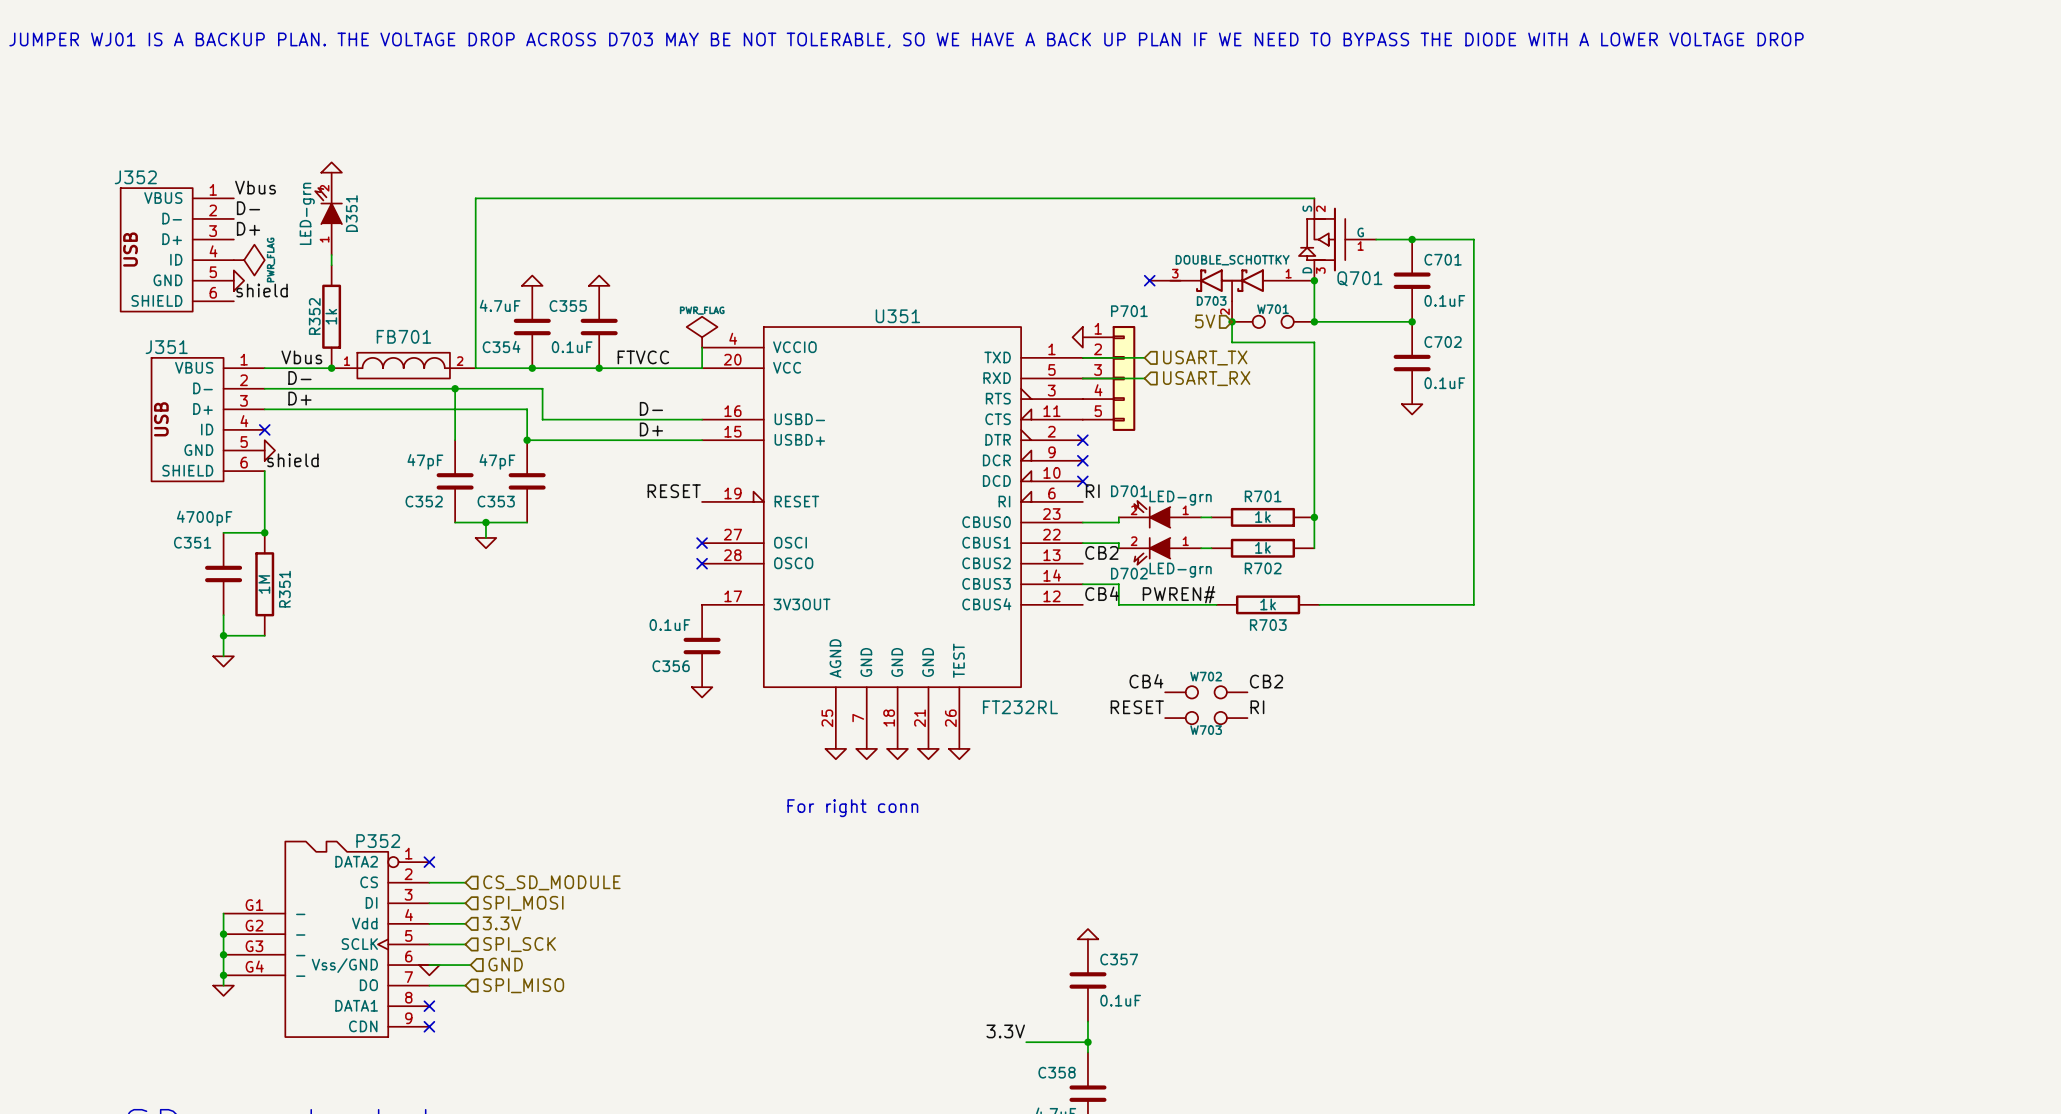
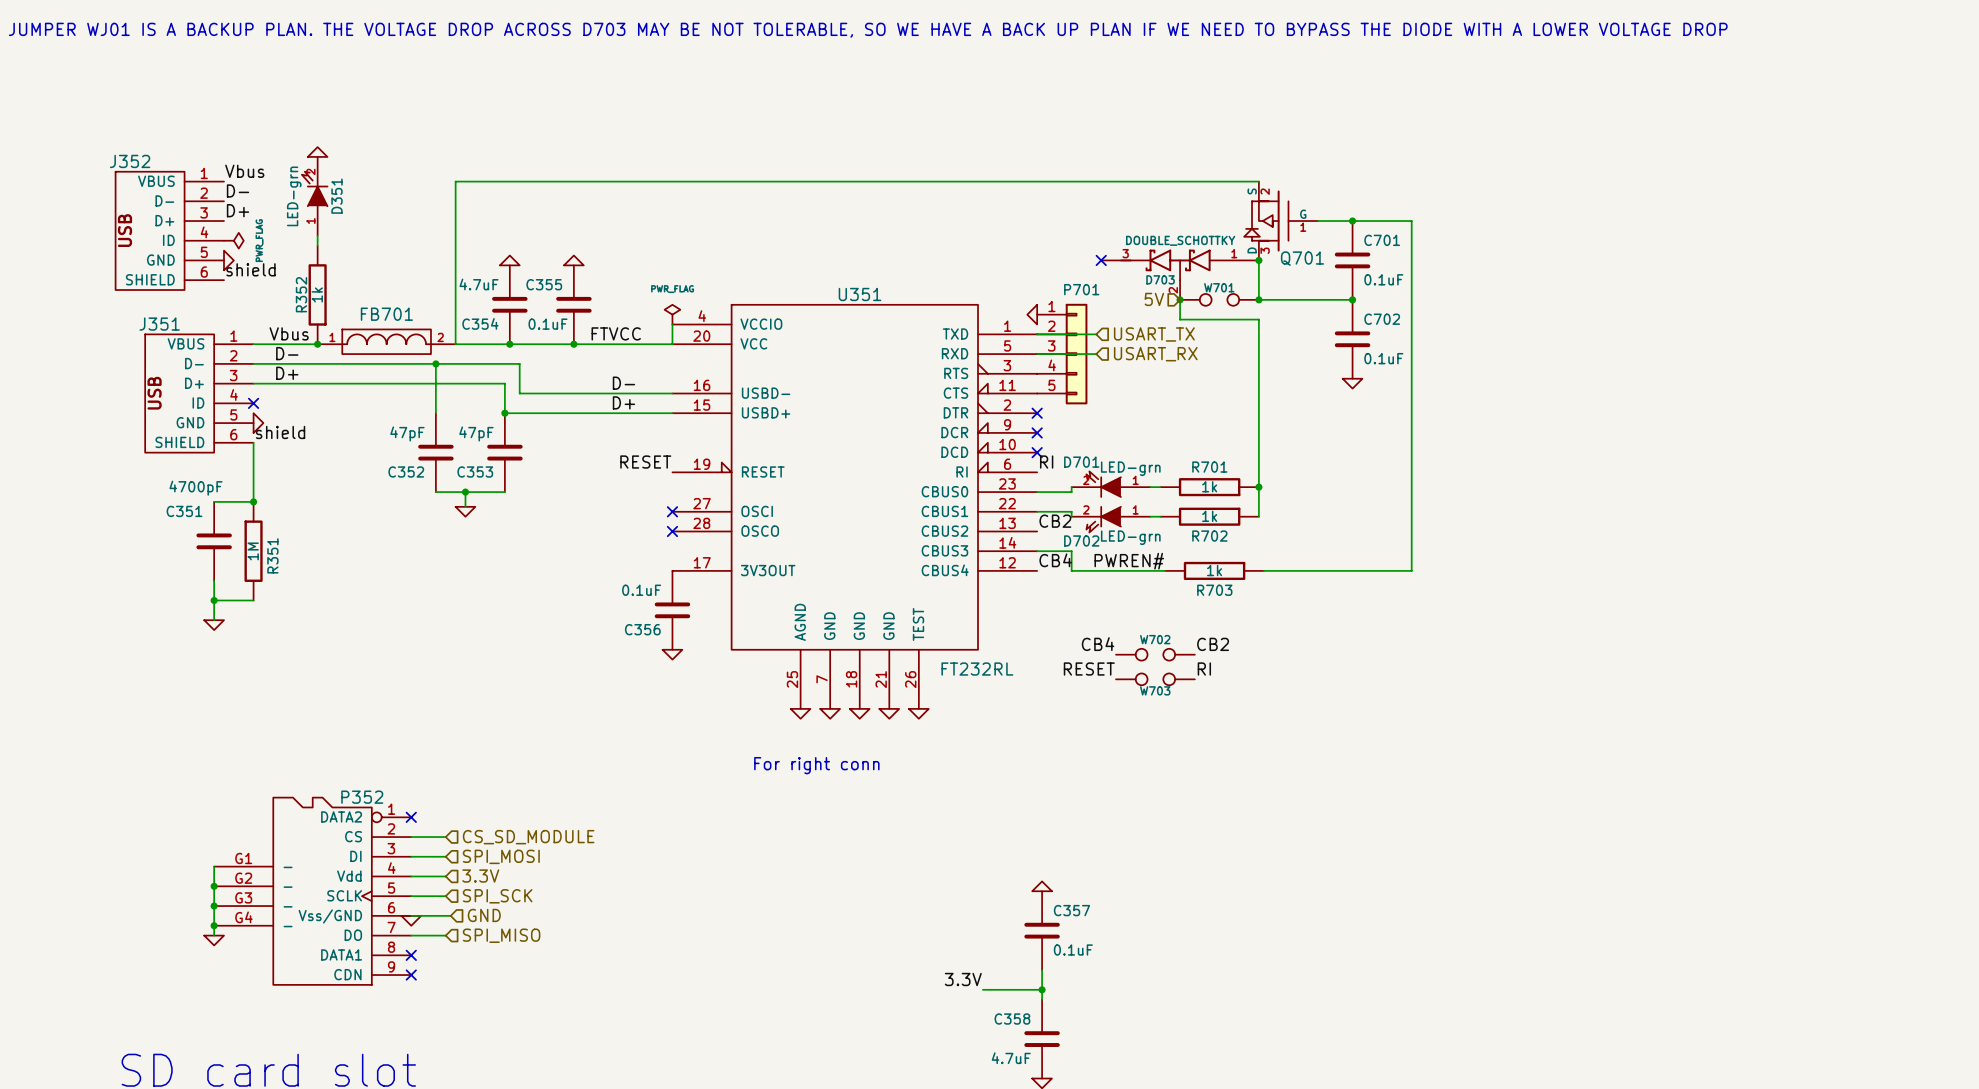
power symbol shape: [233, 244, 265, 276] -> [223, 232, 244, 249]
power symbol shape: [686, 316, 718, 348] -> [664, 304, 681, 325]

